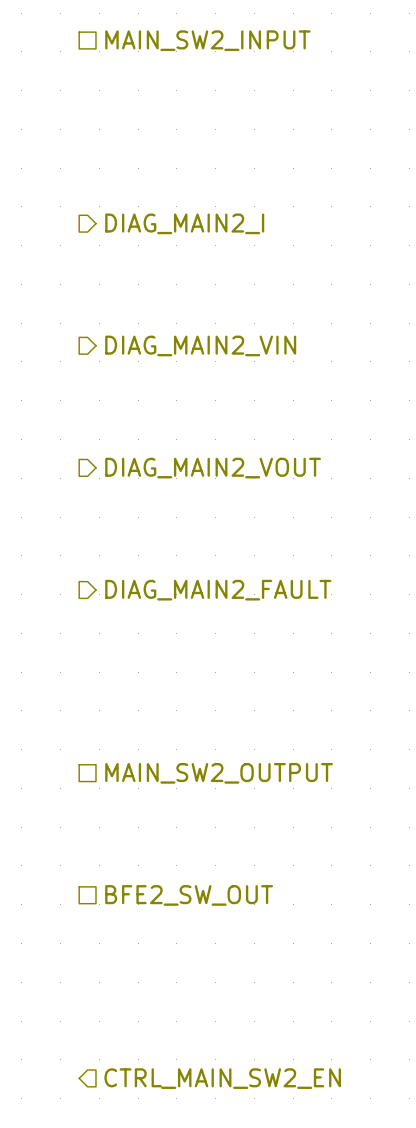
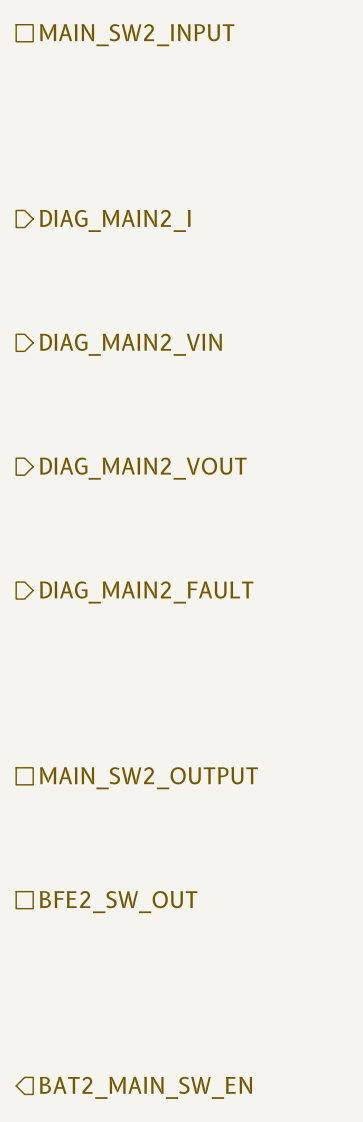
hierarchical label: CTRL_MAIN_SW2_EN (222, 1078) -> BAT2_MAIN_SW_EN (145, 1087)

